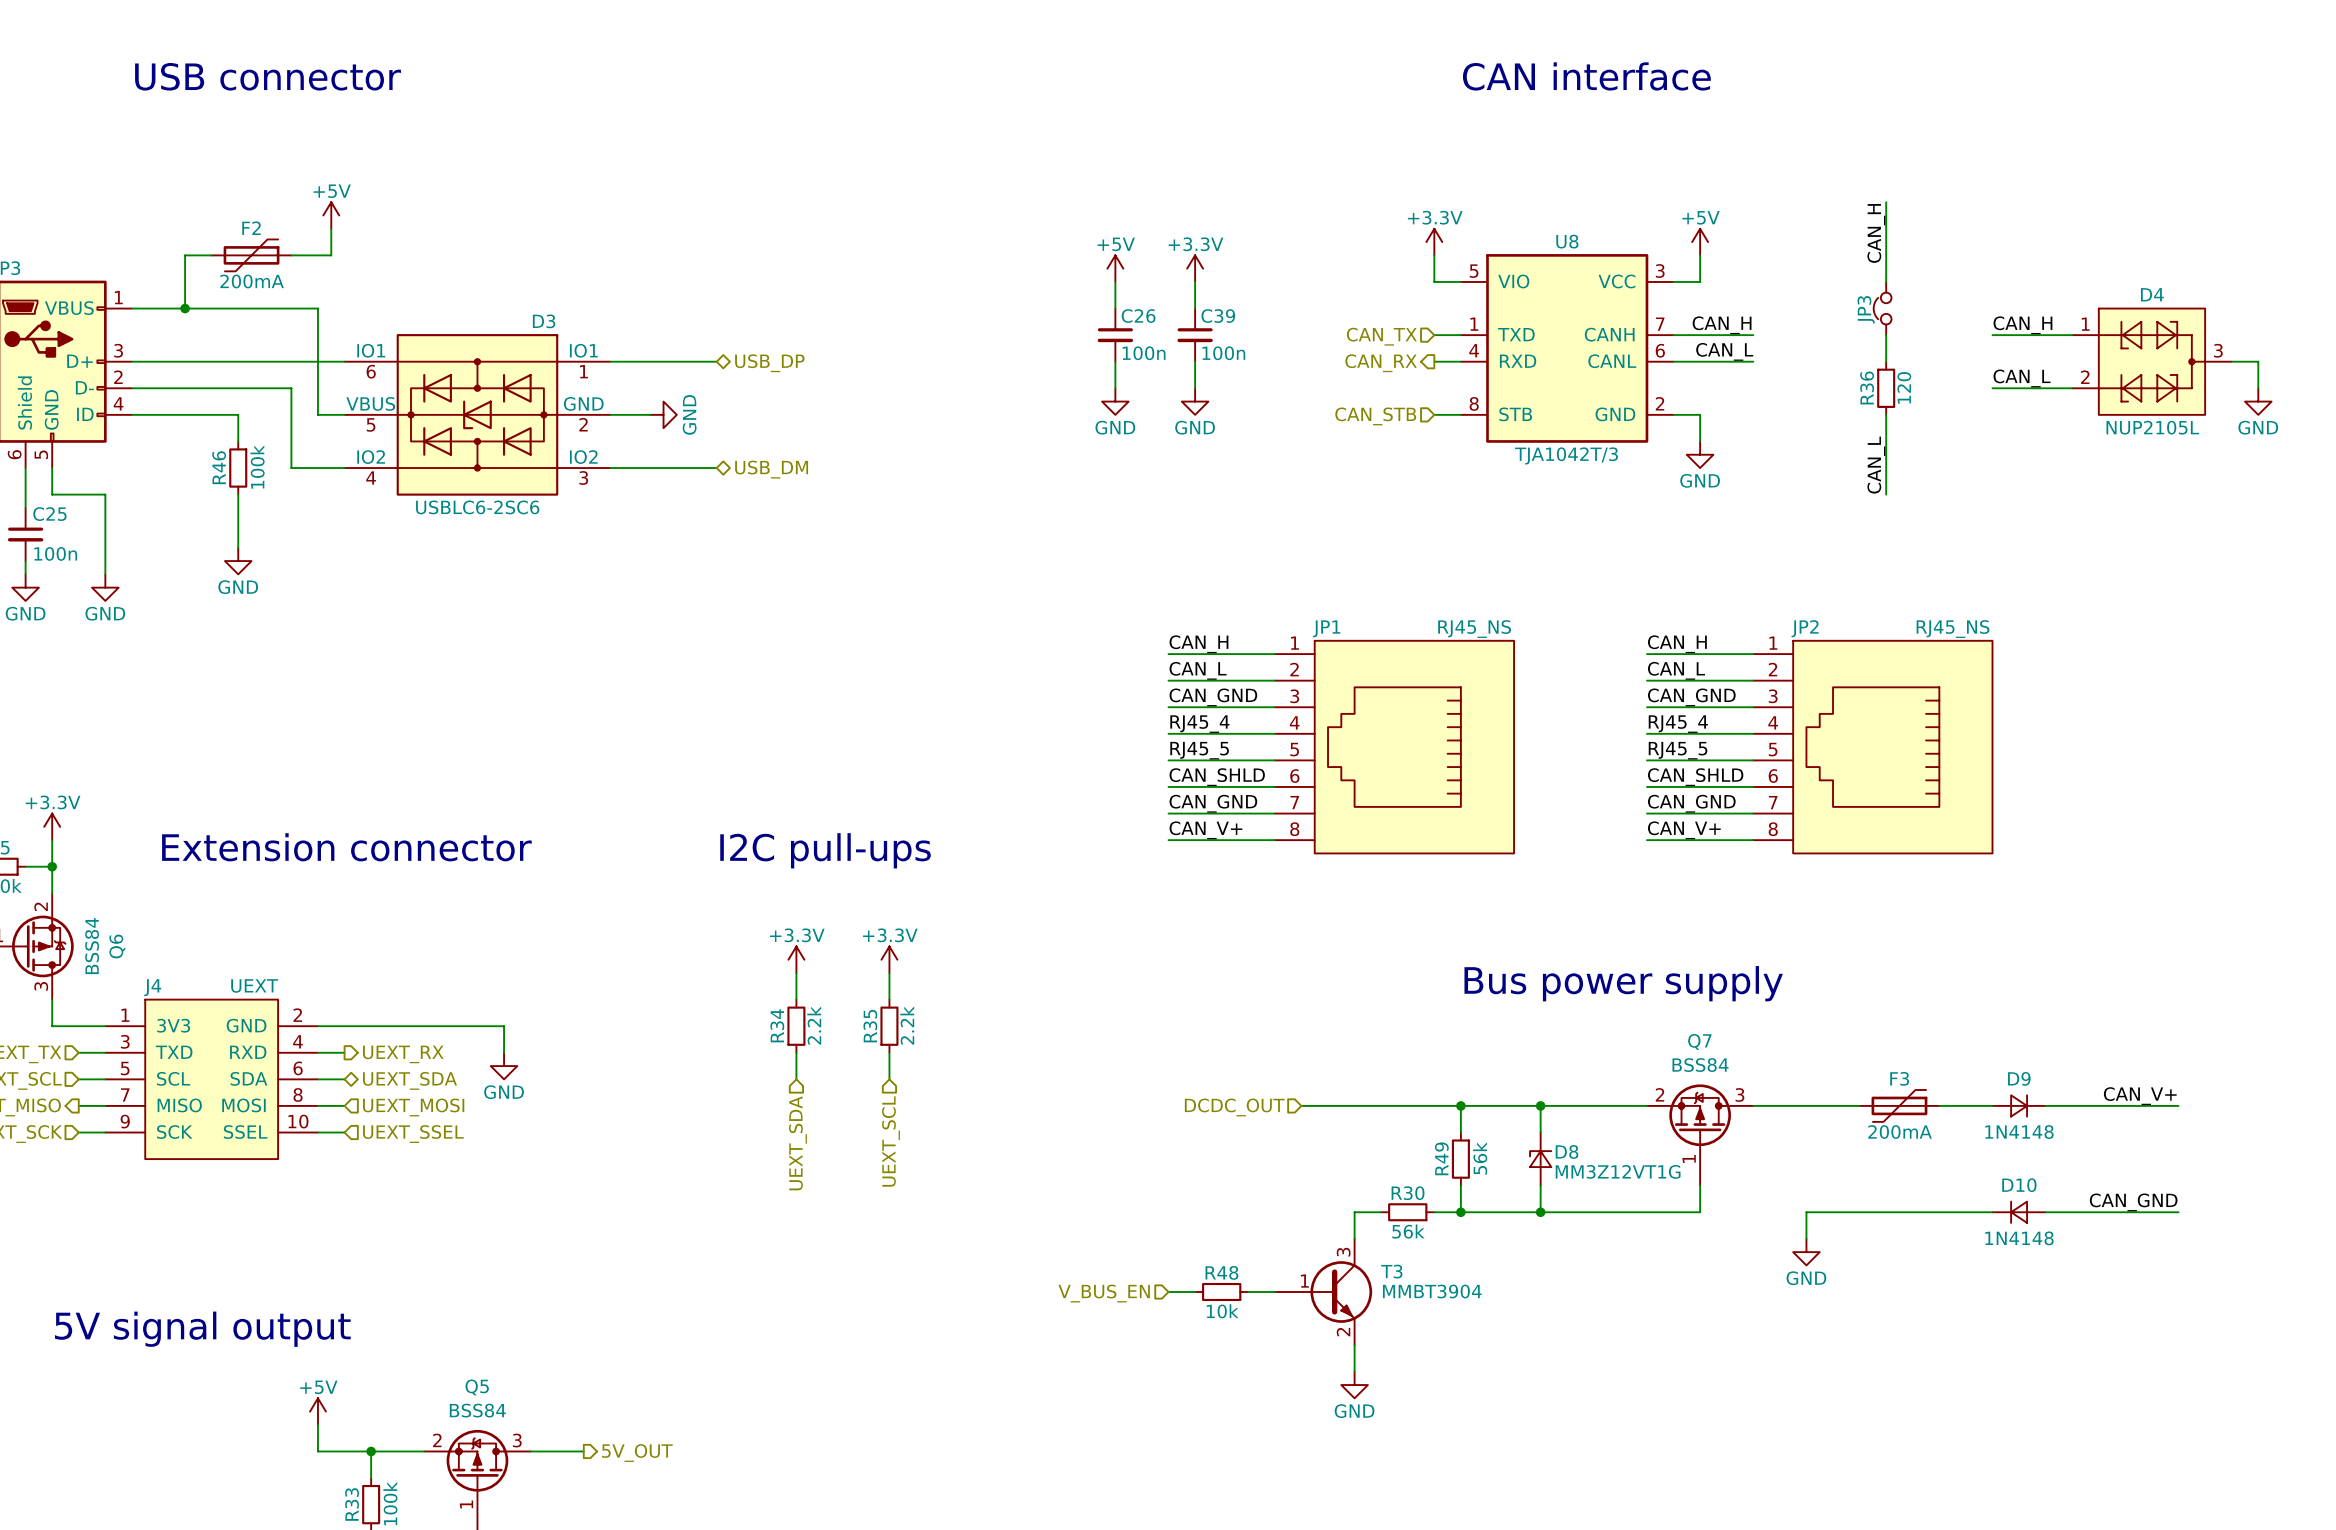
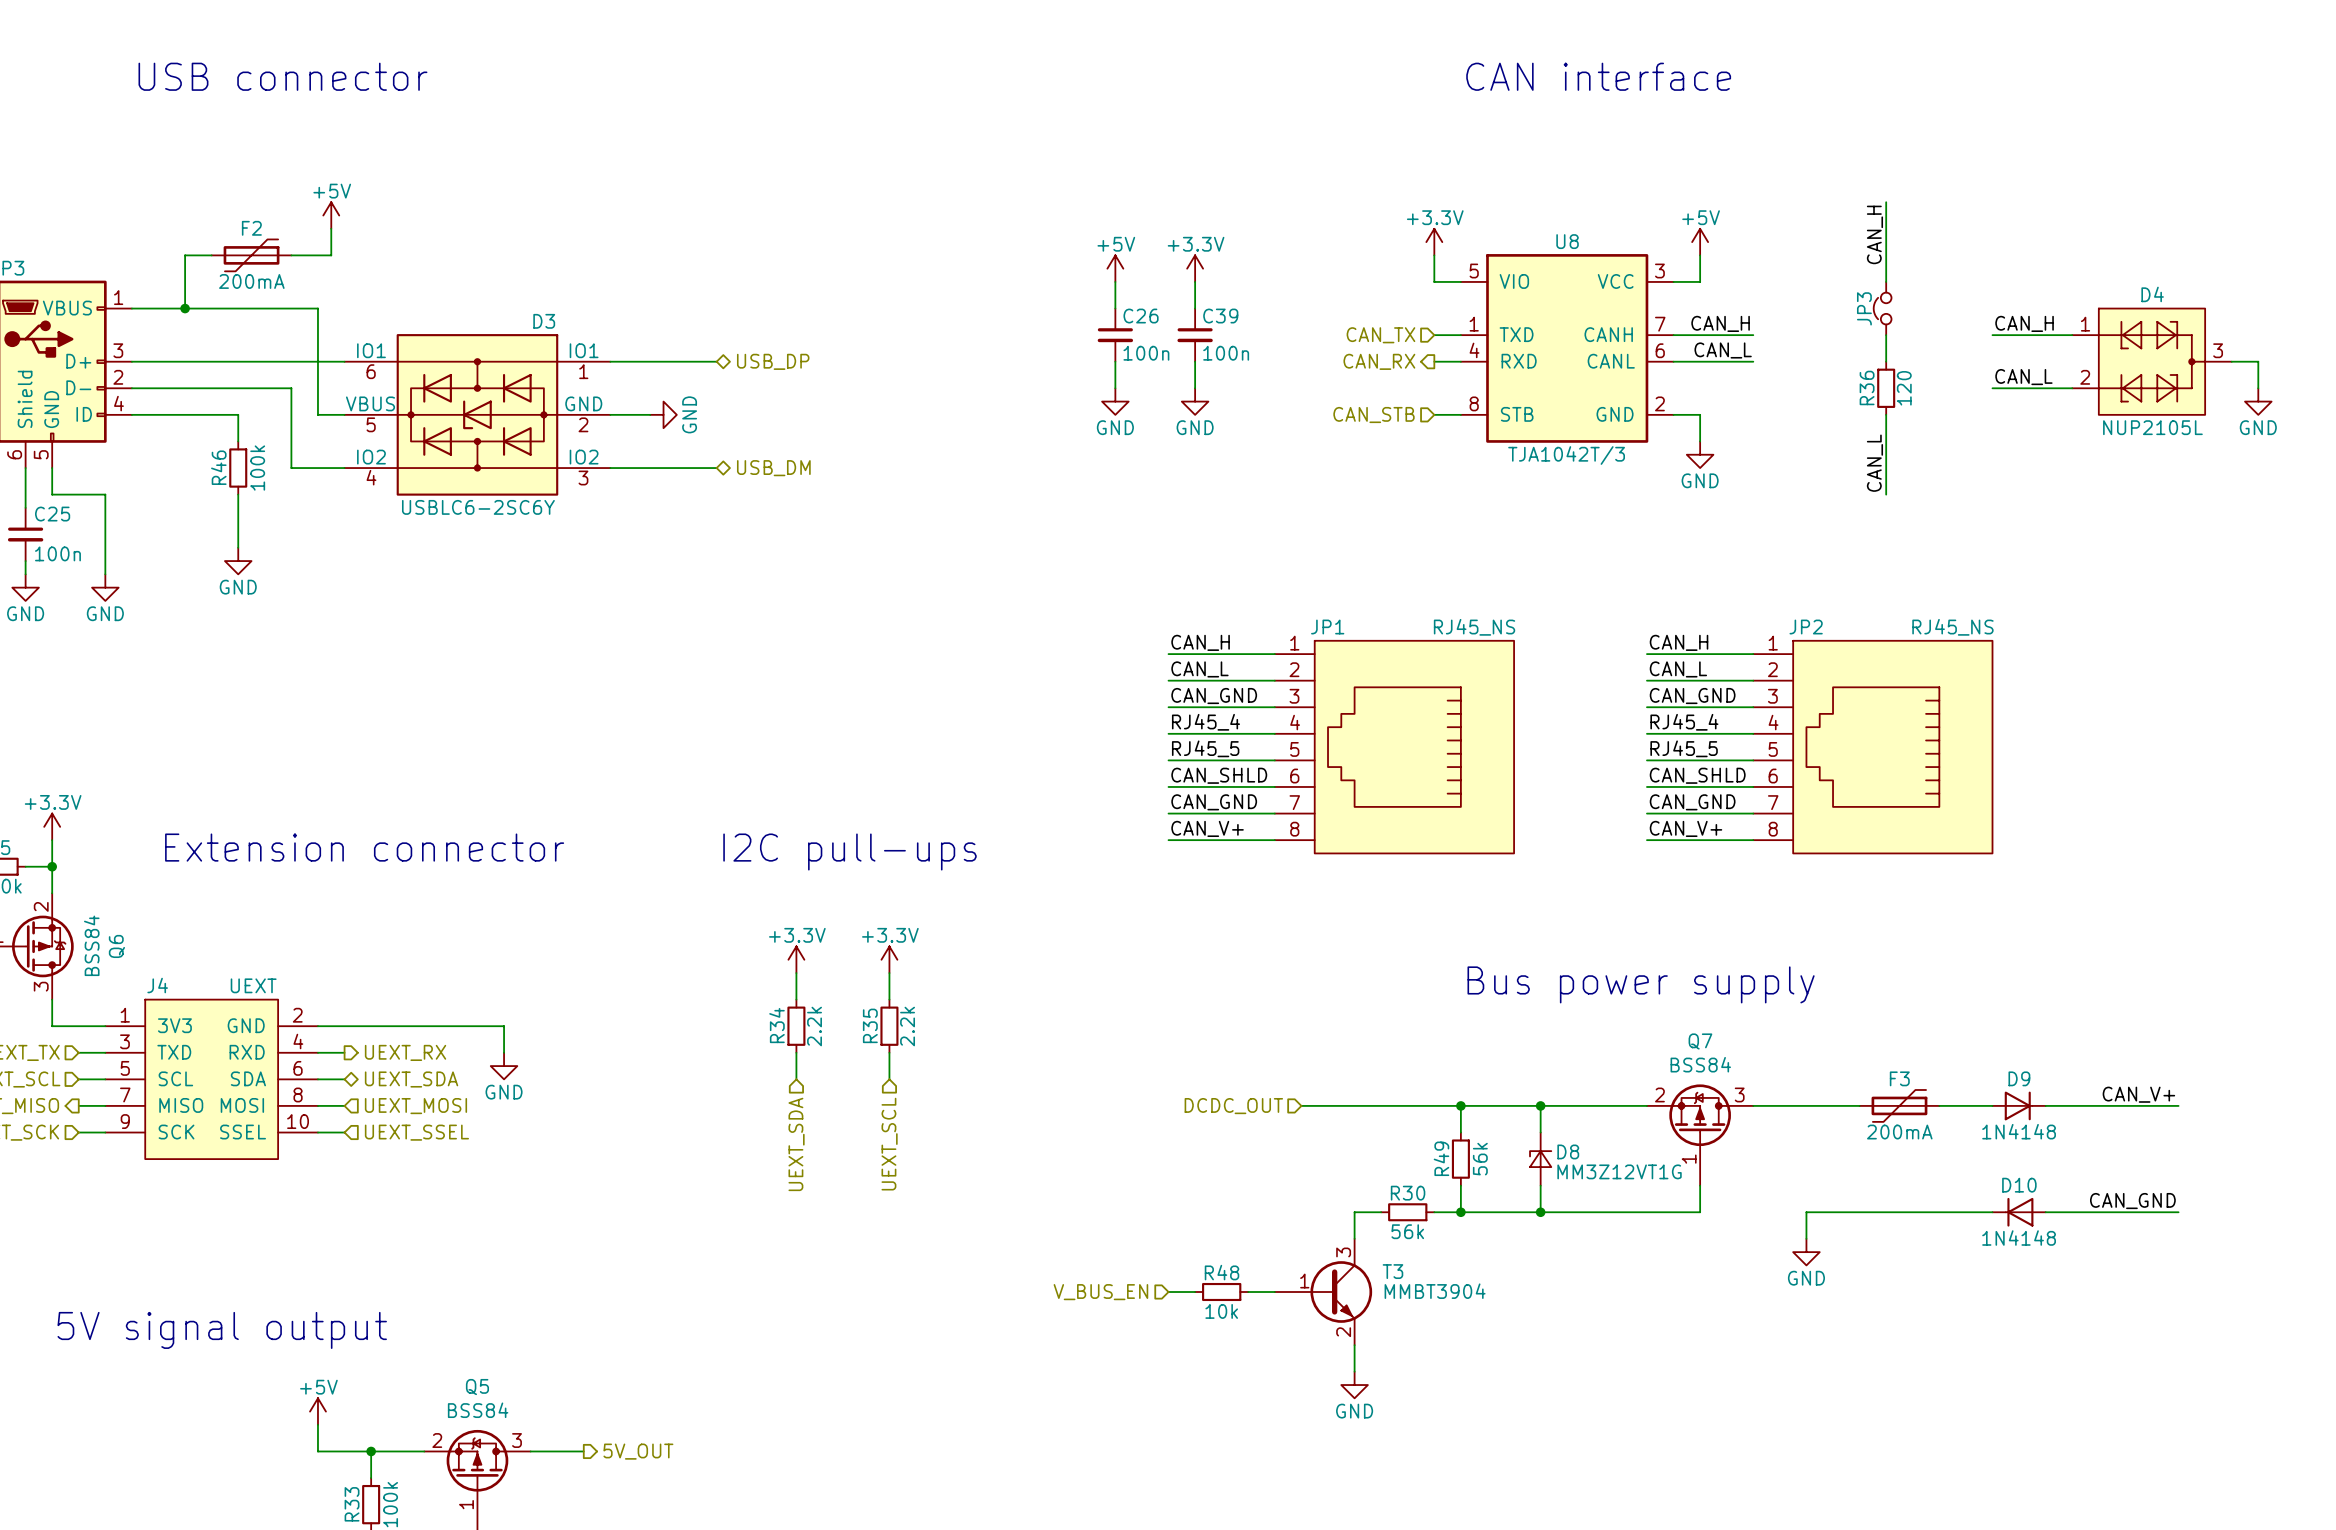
D3 value: USBLC6-2SC6 (477, 507) -> USBLC6-2SC6Y (478, 507)
D9 symbol: [1992, 1095, 2046, 1117] -> [1992, 1091, 2046, 1121]
D10 symbol: [1992, 1201, 2046, 1223] -> [1992, 1197, 2046, 1227]

